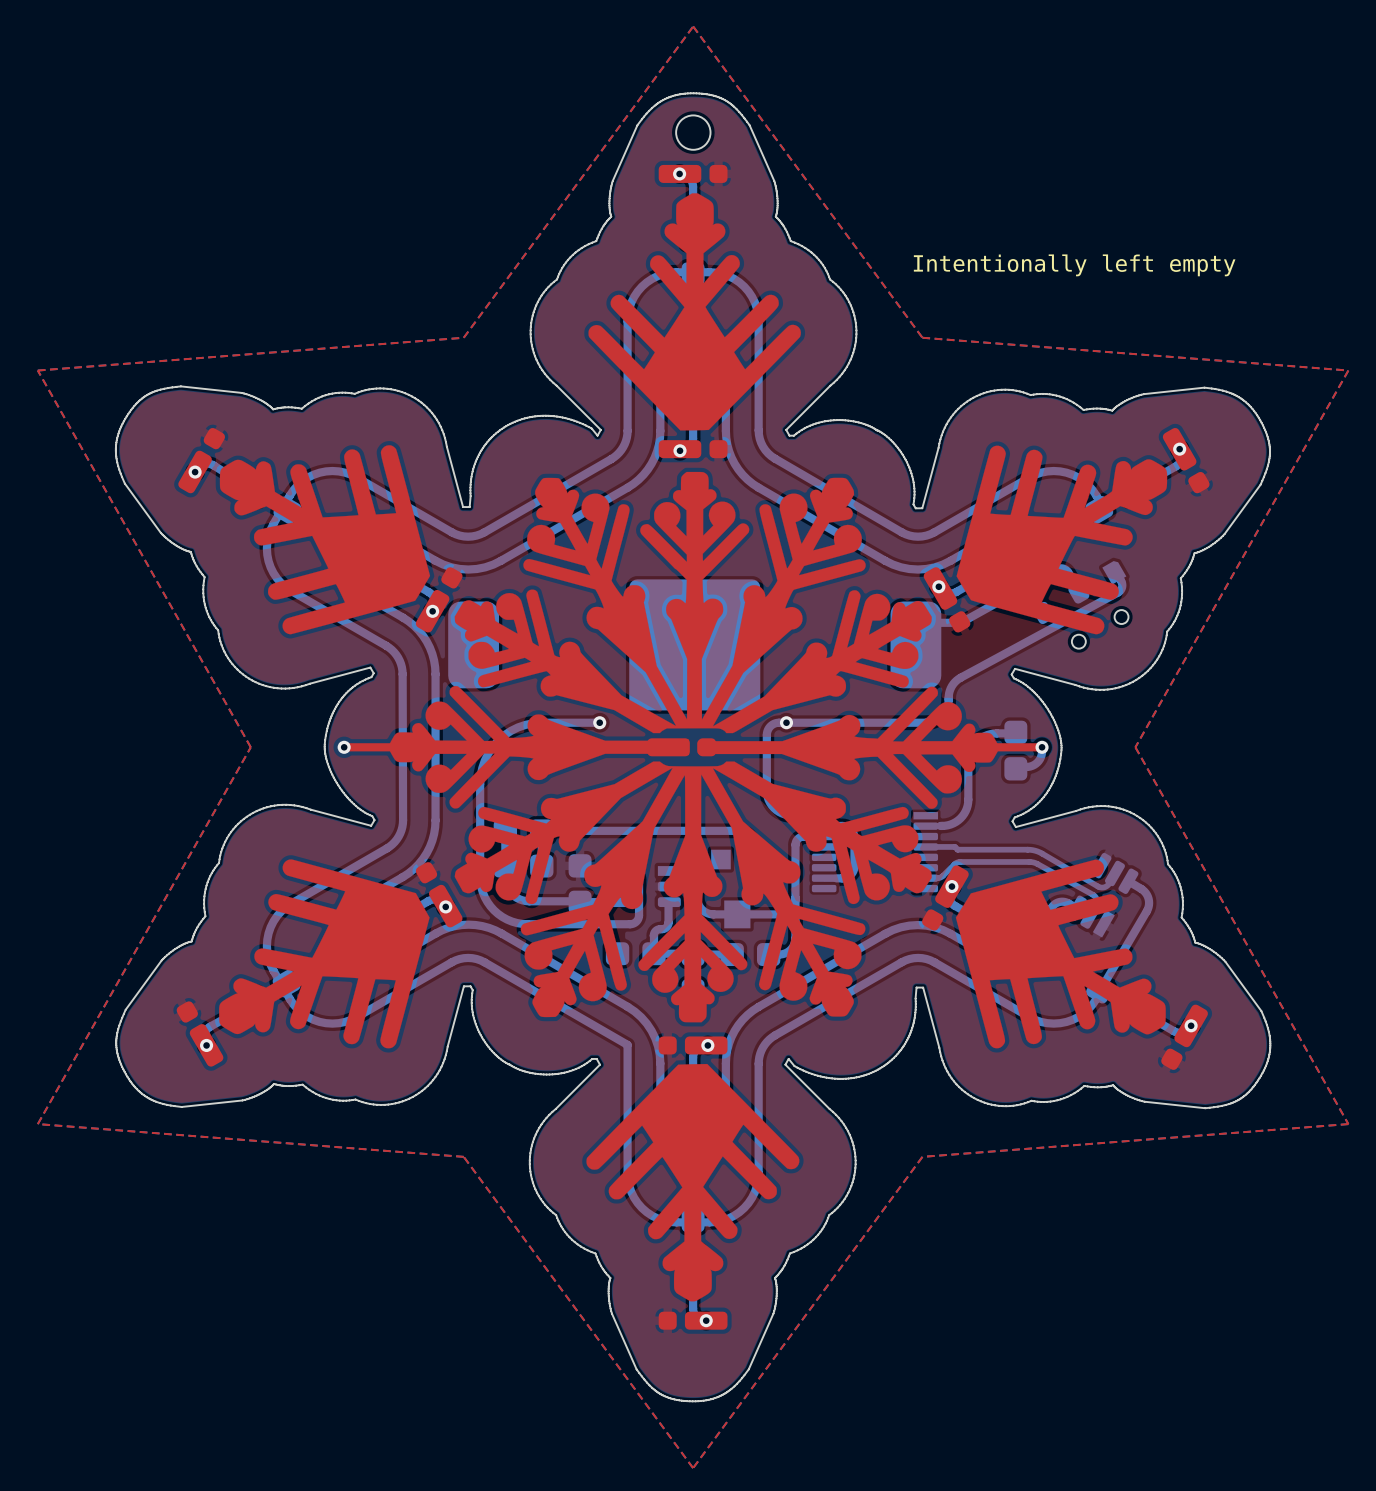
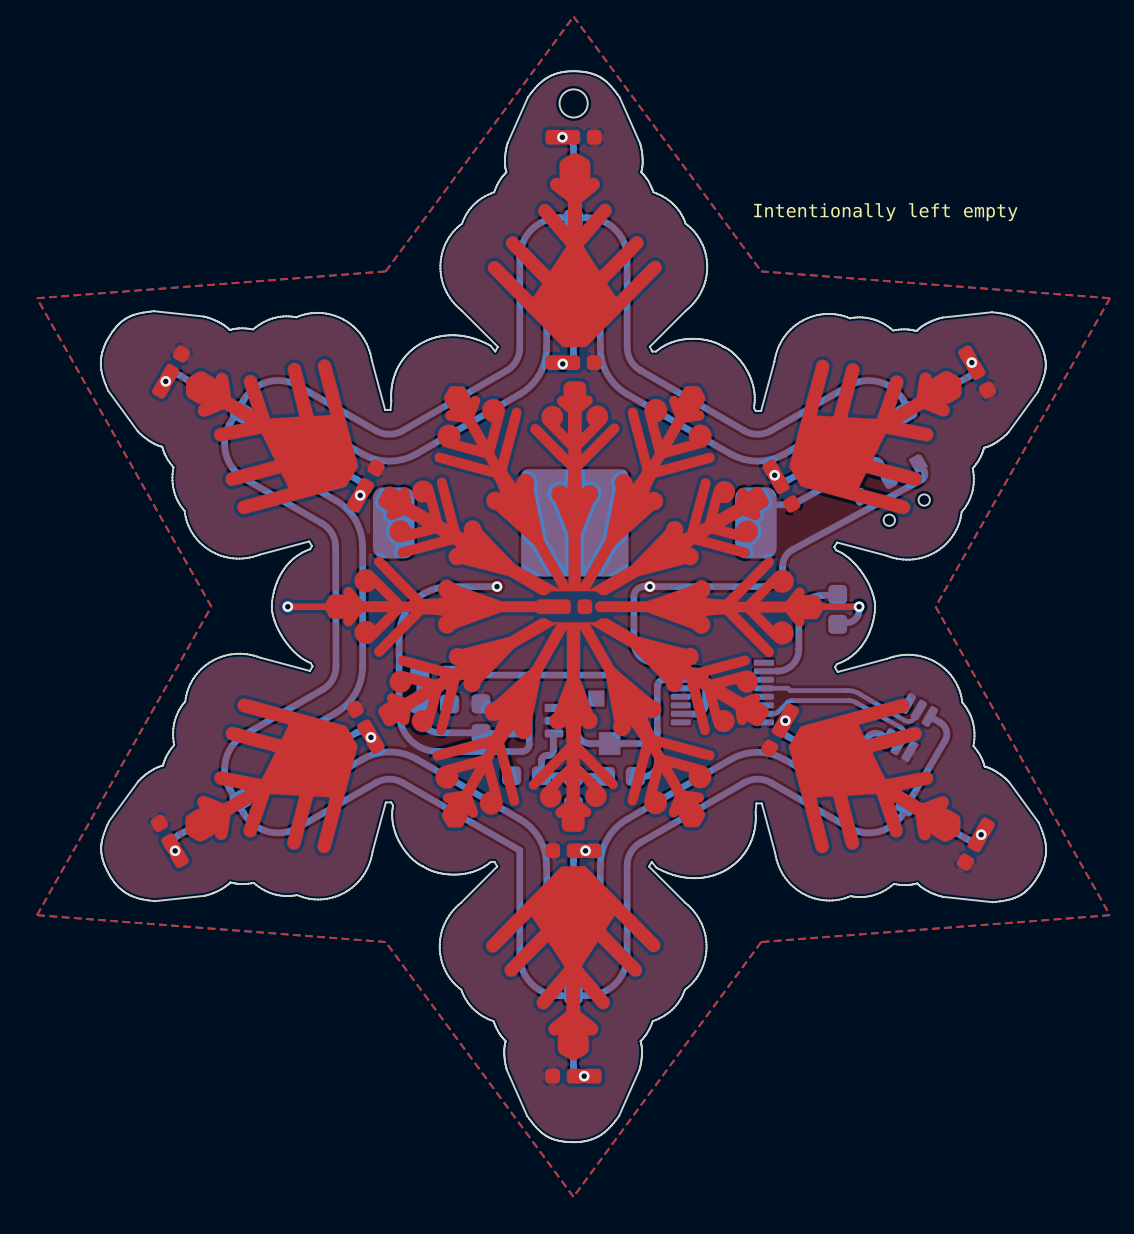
part footprint: [115, 92, 1272, 1403] -> [100, 70, 1047, 1143]

